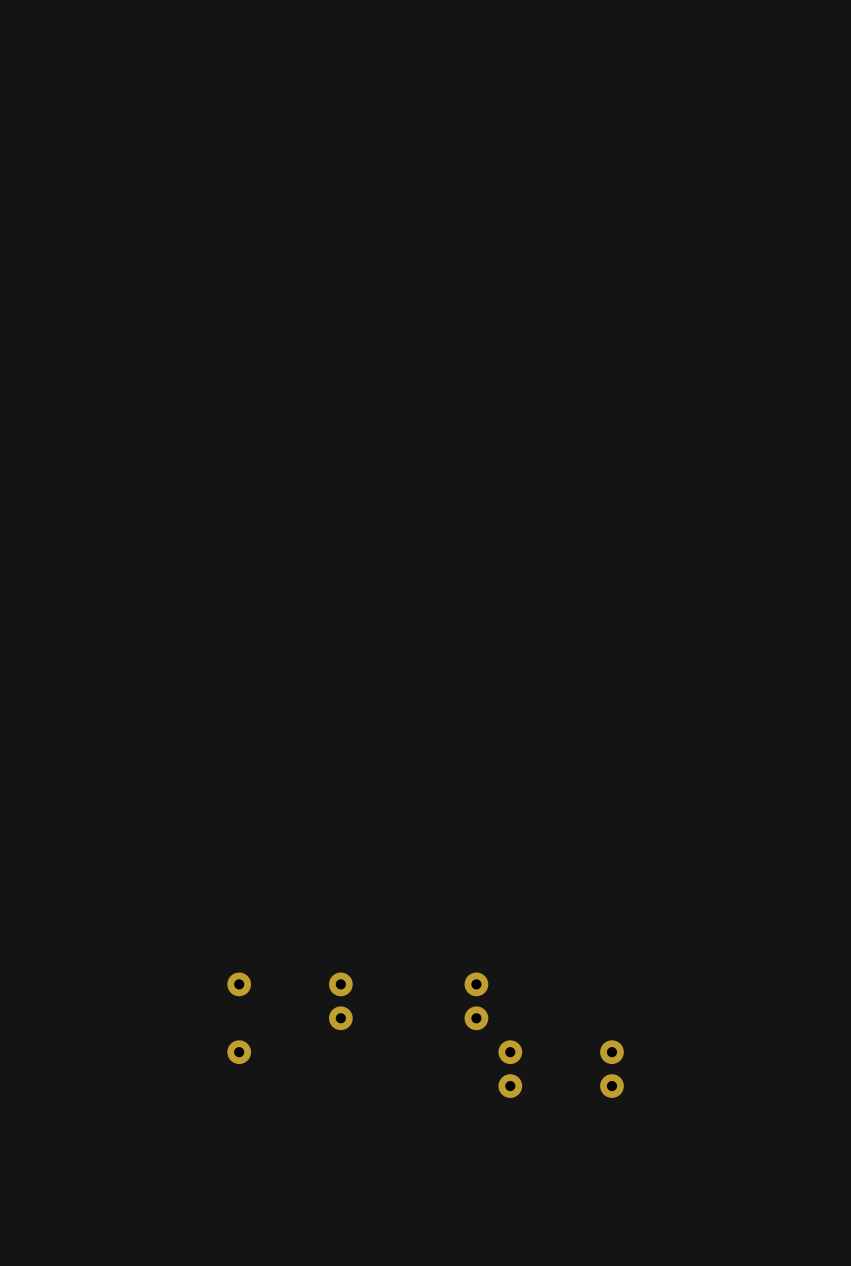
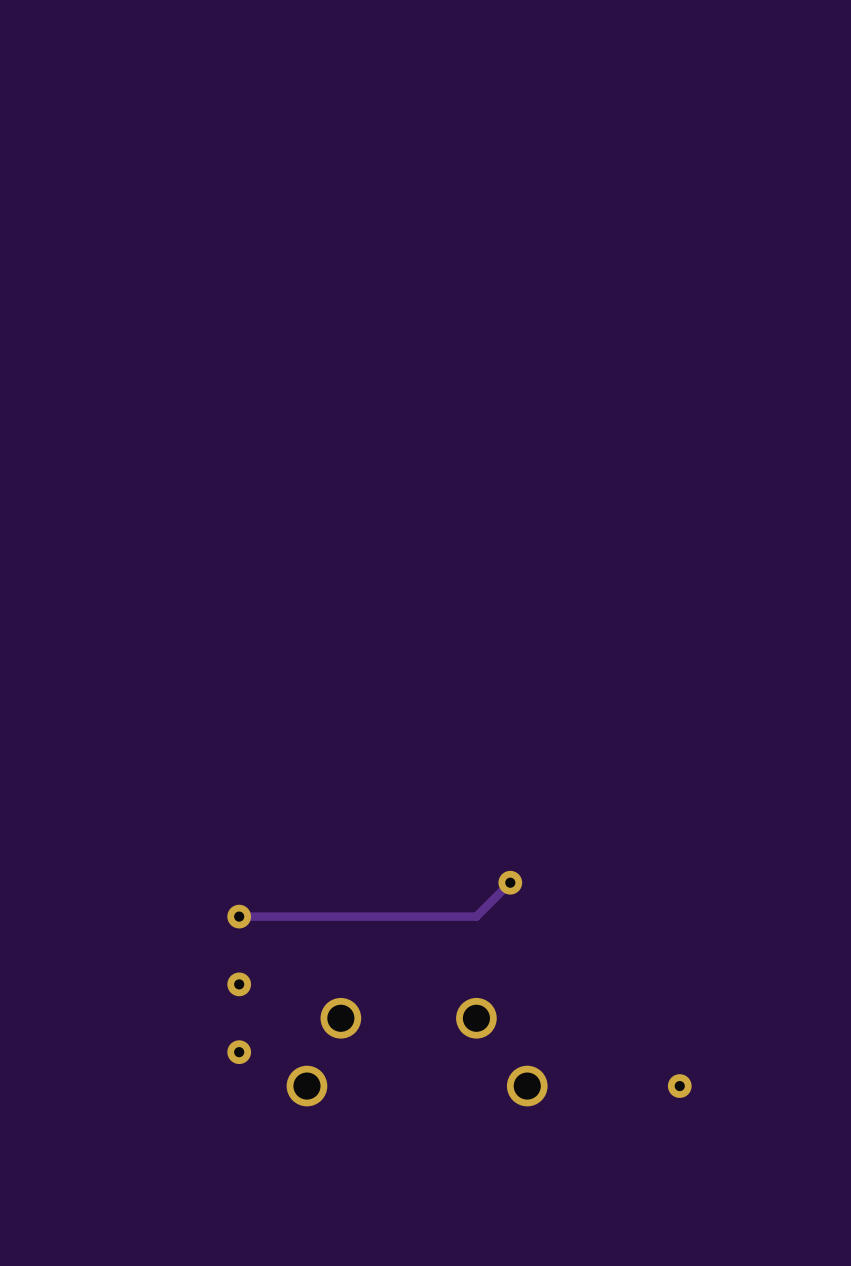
track: none -> (510, 882) (476, 916) (239, 916)
via: none -> (510, 882)
via: none -> (239, 916)
via: (340, 984) -> none
via: (476, 984) -> none
via size: [329, 1006, 353, 1031] -> [320, 997, 362, 1039]
via size: [464, 1006, 489, 1031] -> [456, 997, 497, 1039]
via: (510, 1052) -> none
via: (611, 1052) -> none
via size: [498, 1074, 523, 1098] -> [506, 1065, 548, 1107]
via: none -> (306, 1086)
via: (611, 1086) -> none
via: none -> (679, 1086)

